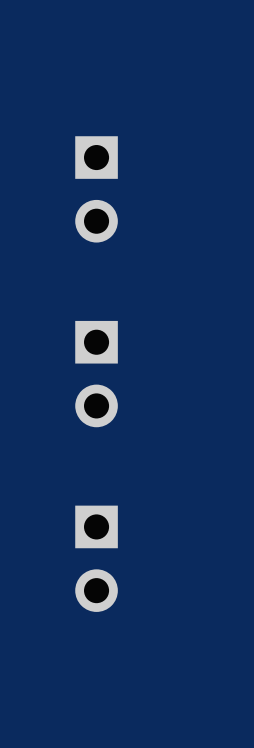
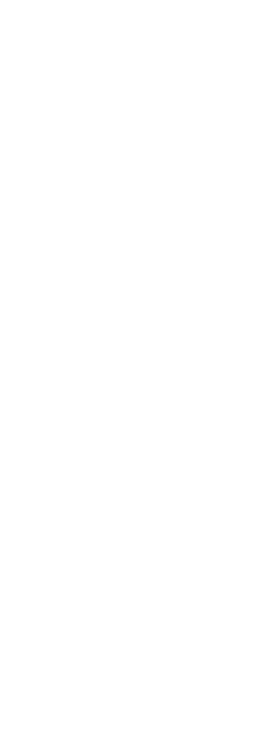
part: (96, 189) -> none
part: (96, 374) -> none
part: (96, 558) -> none

